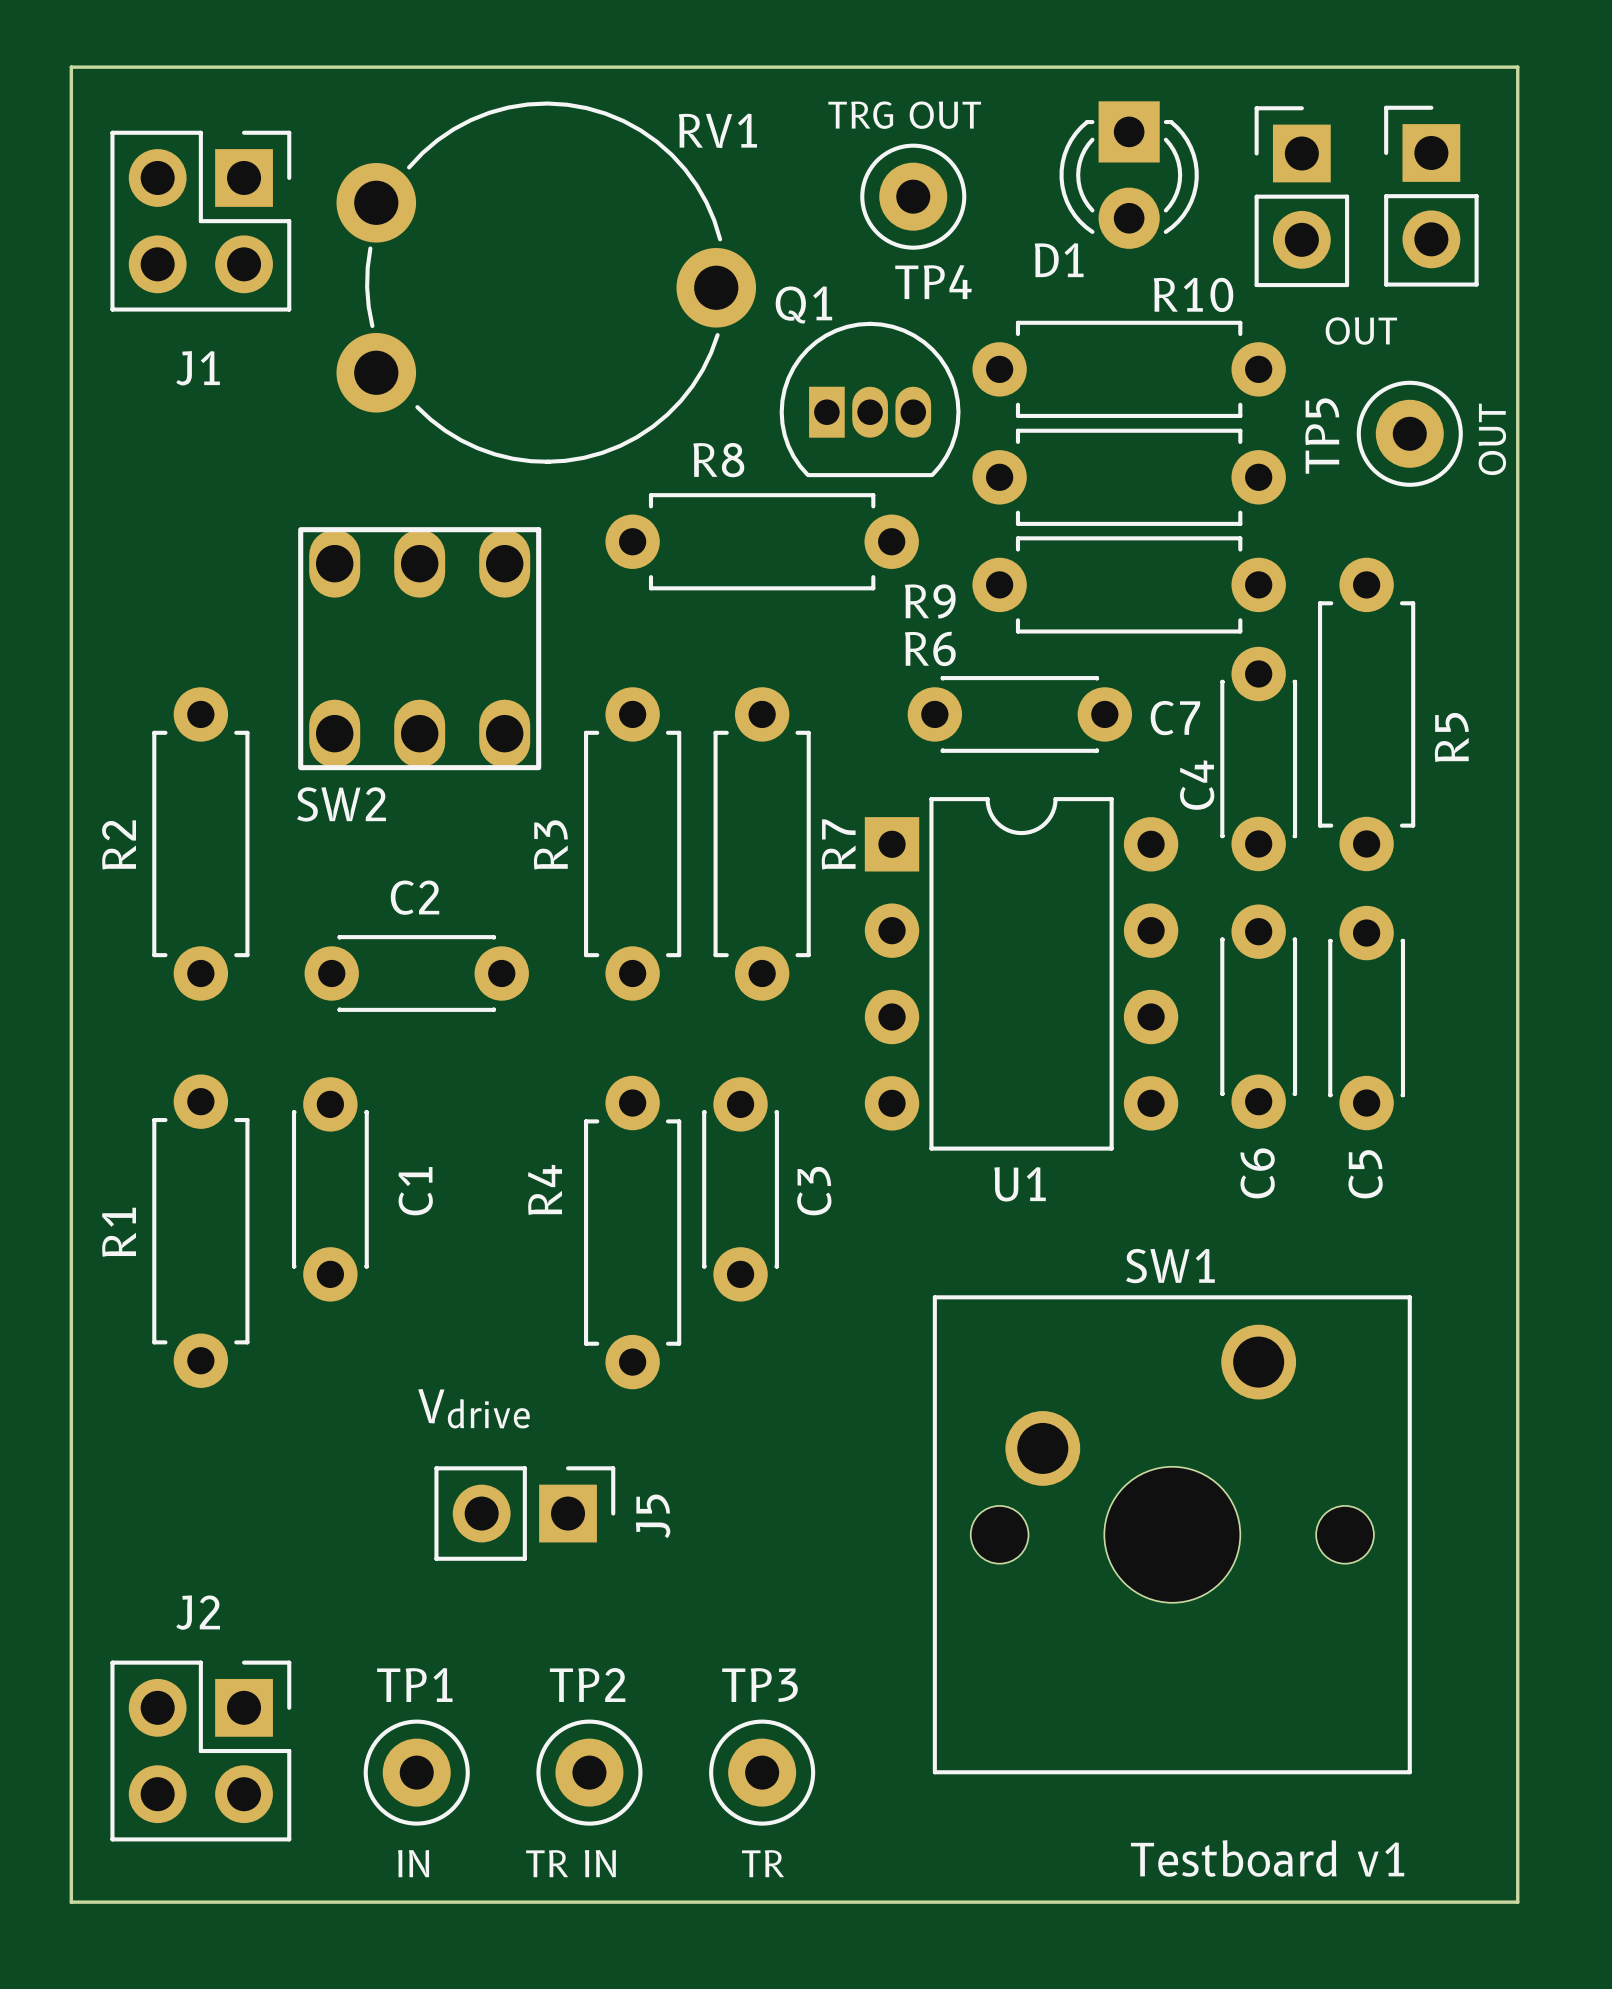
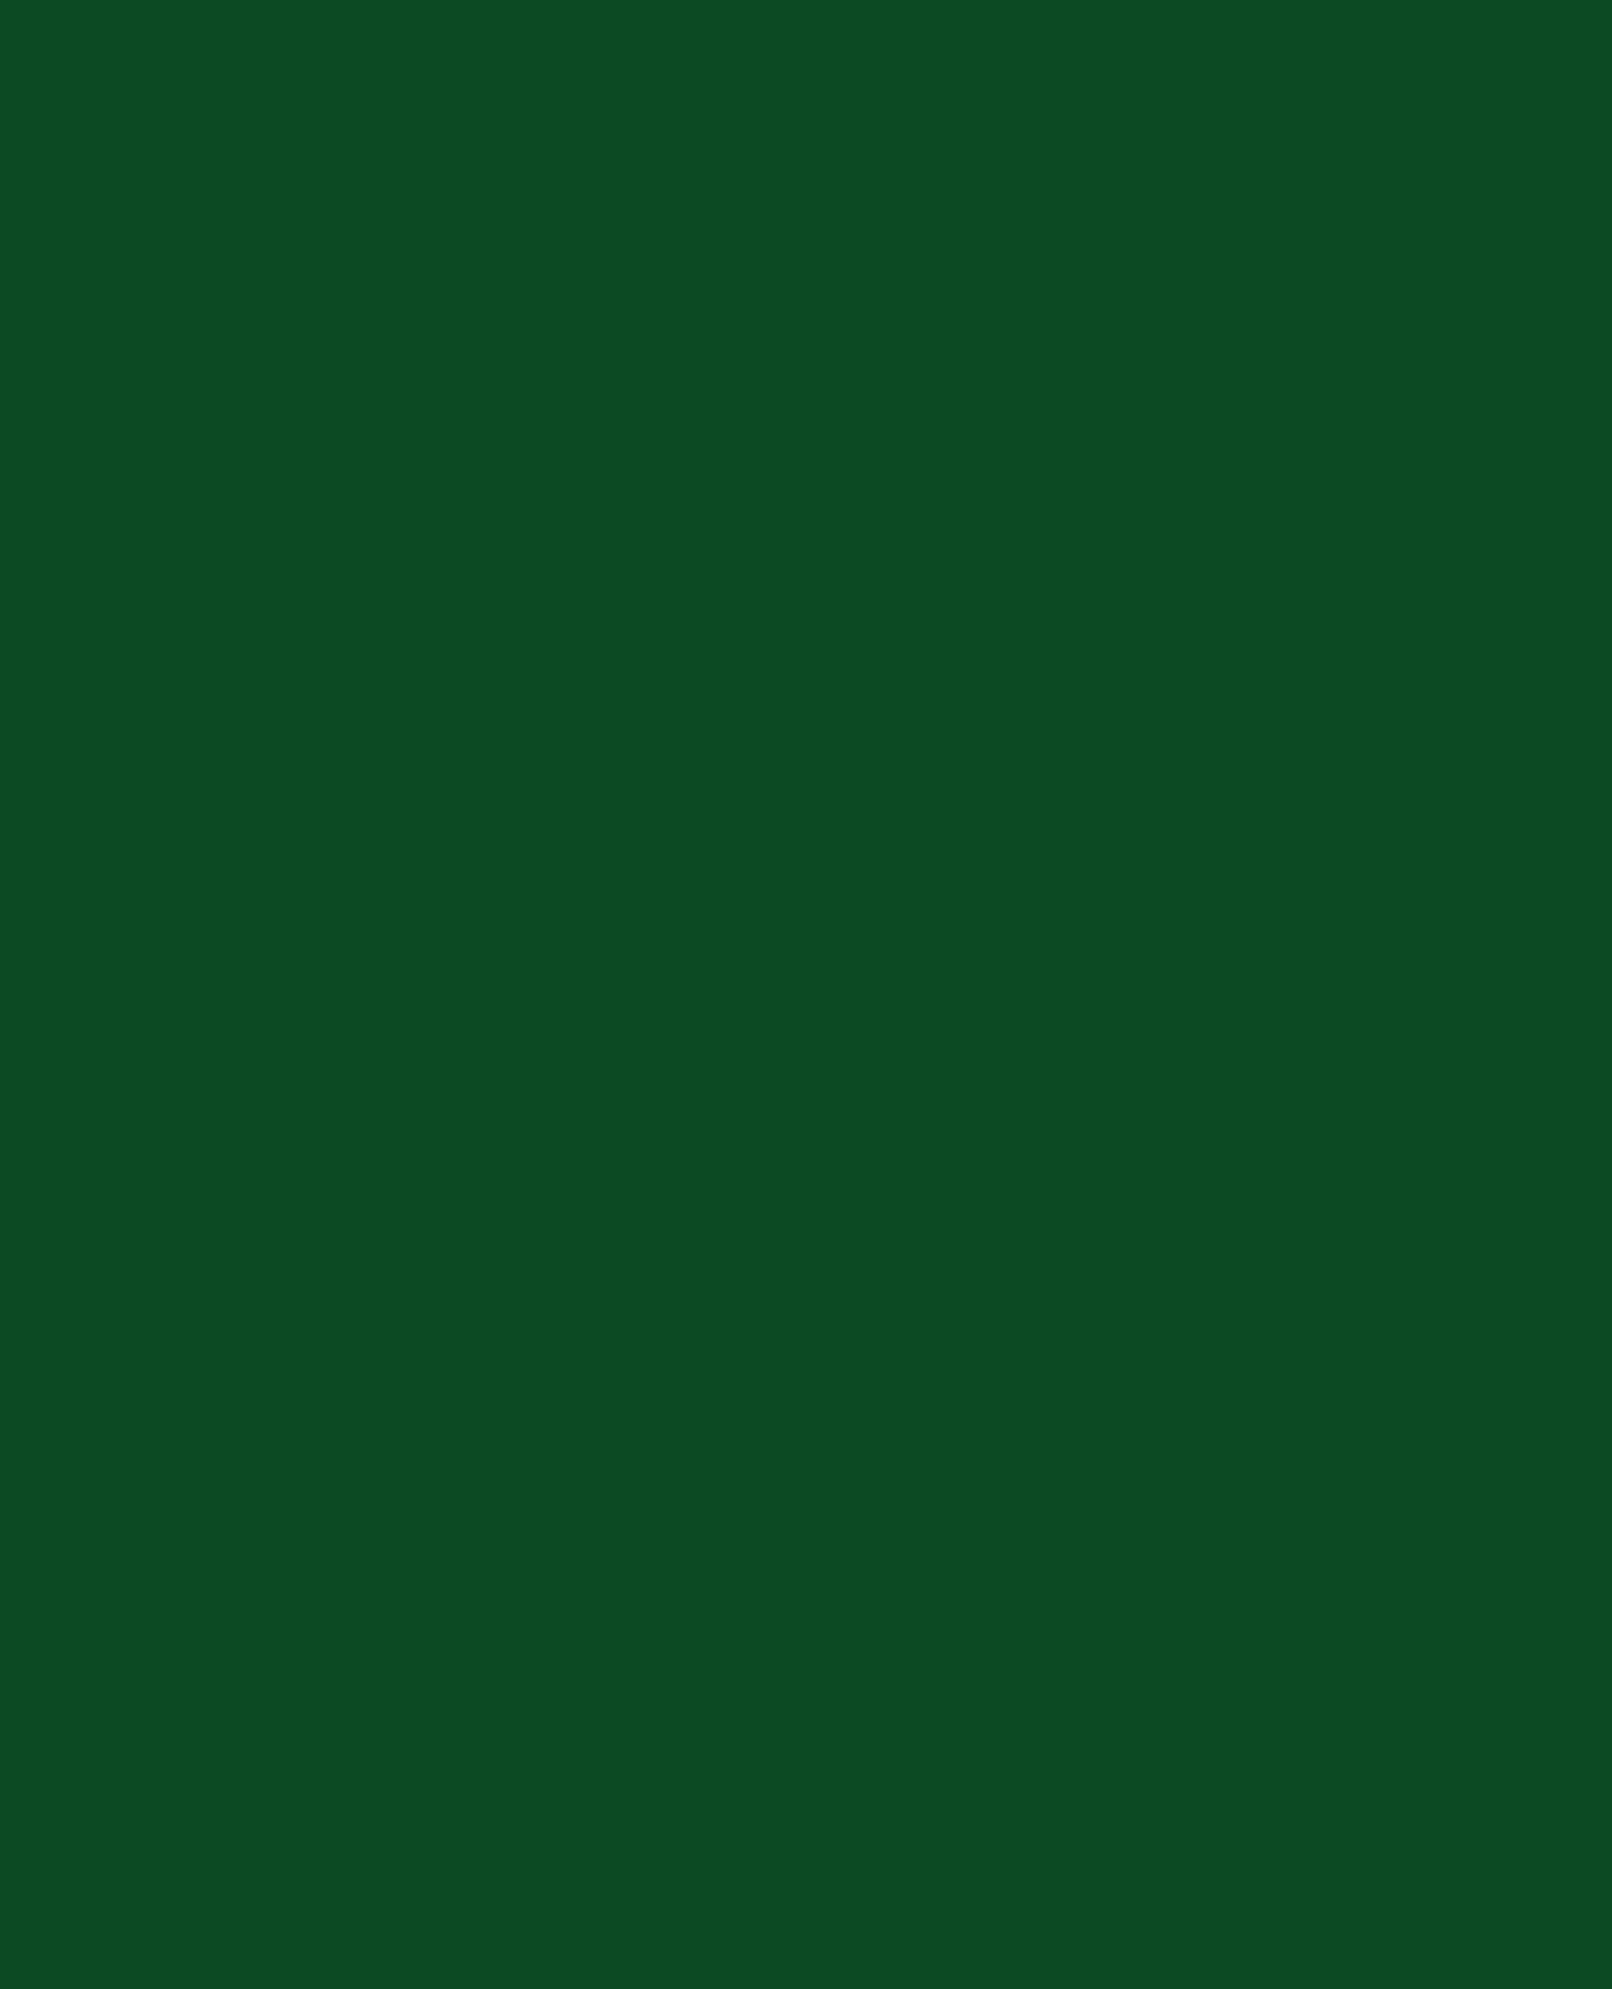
board edge: (71, 67) (71, 1902) (1517, 1902) (1517, 67) (71, 67) -> none
text: TRG OUT (904, 115) -> none
D1: (1129, 175) -> none
TP4: (913, 196) -> none
part: (1301, 196) -> none
part: (1431, 196) -> none
J1: (200, 221) -> none
RV1: (546, 282) -> none
text: OUT (1361, 331) -> none
R10: (1129, 369) -> none
Q1: (870, 399) -> none
TP5: (1409, 433) -> none
text: OUT (1492, 439) -> none
R9: (1129, 477) -> none
R8: (762, 541) -> none
R6: (1129, 584) -> none
SW2: (419, 648) -> none
C7: (1019, 714) -> none
R5: (1366, 714) -> none
C4: (1258, 758) -> none
R2: (200, 843) -> none
R3: (632, 843) -> none
R7: (762, 843) -> none
C2: (416, 973) -> none
U1: (1021, 973) -> none
C6: (1258, 1016) -> none
C5: (1366, 1018) -> none
C1: (330, 1189) -> none
C3: (740, 1189) -> none
R1: (200, 1231) -> none
R4: (632, 1232) -> none
text: Vdrive (473, 1408) -> none
J5: (524, 1513) -> none
SW1: (1172, 1534) -> none
J2: (200, 1751) -> none
TP1: (416, 1772) -> none
TP2: (589, 1772) -> none
TP3: (762, 1772) -> none
text: Testboard v1 (1267, 1858) -> none
text: IN (413, 1863) -> none
text: TR IN (570, 1863) -> none
text: TR (763, 1863) -> none

